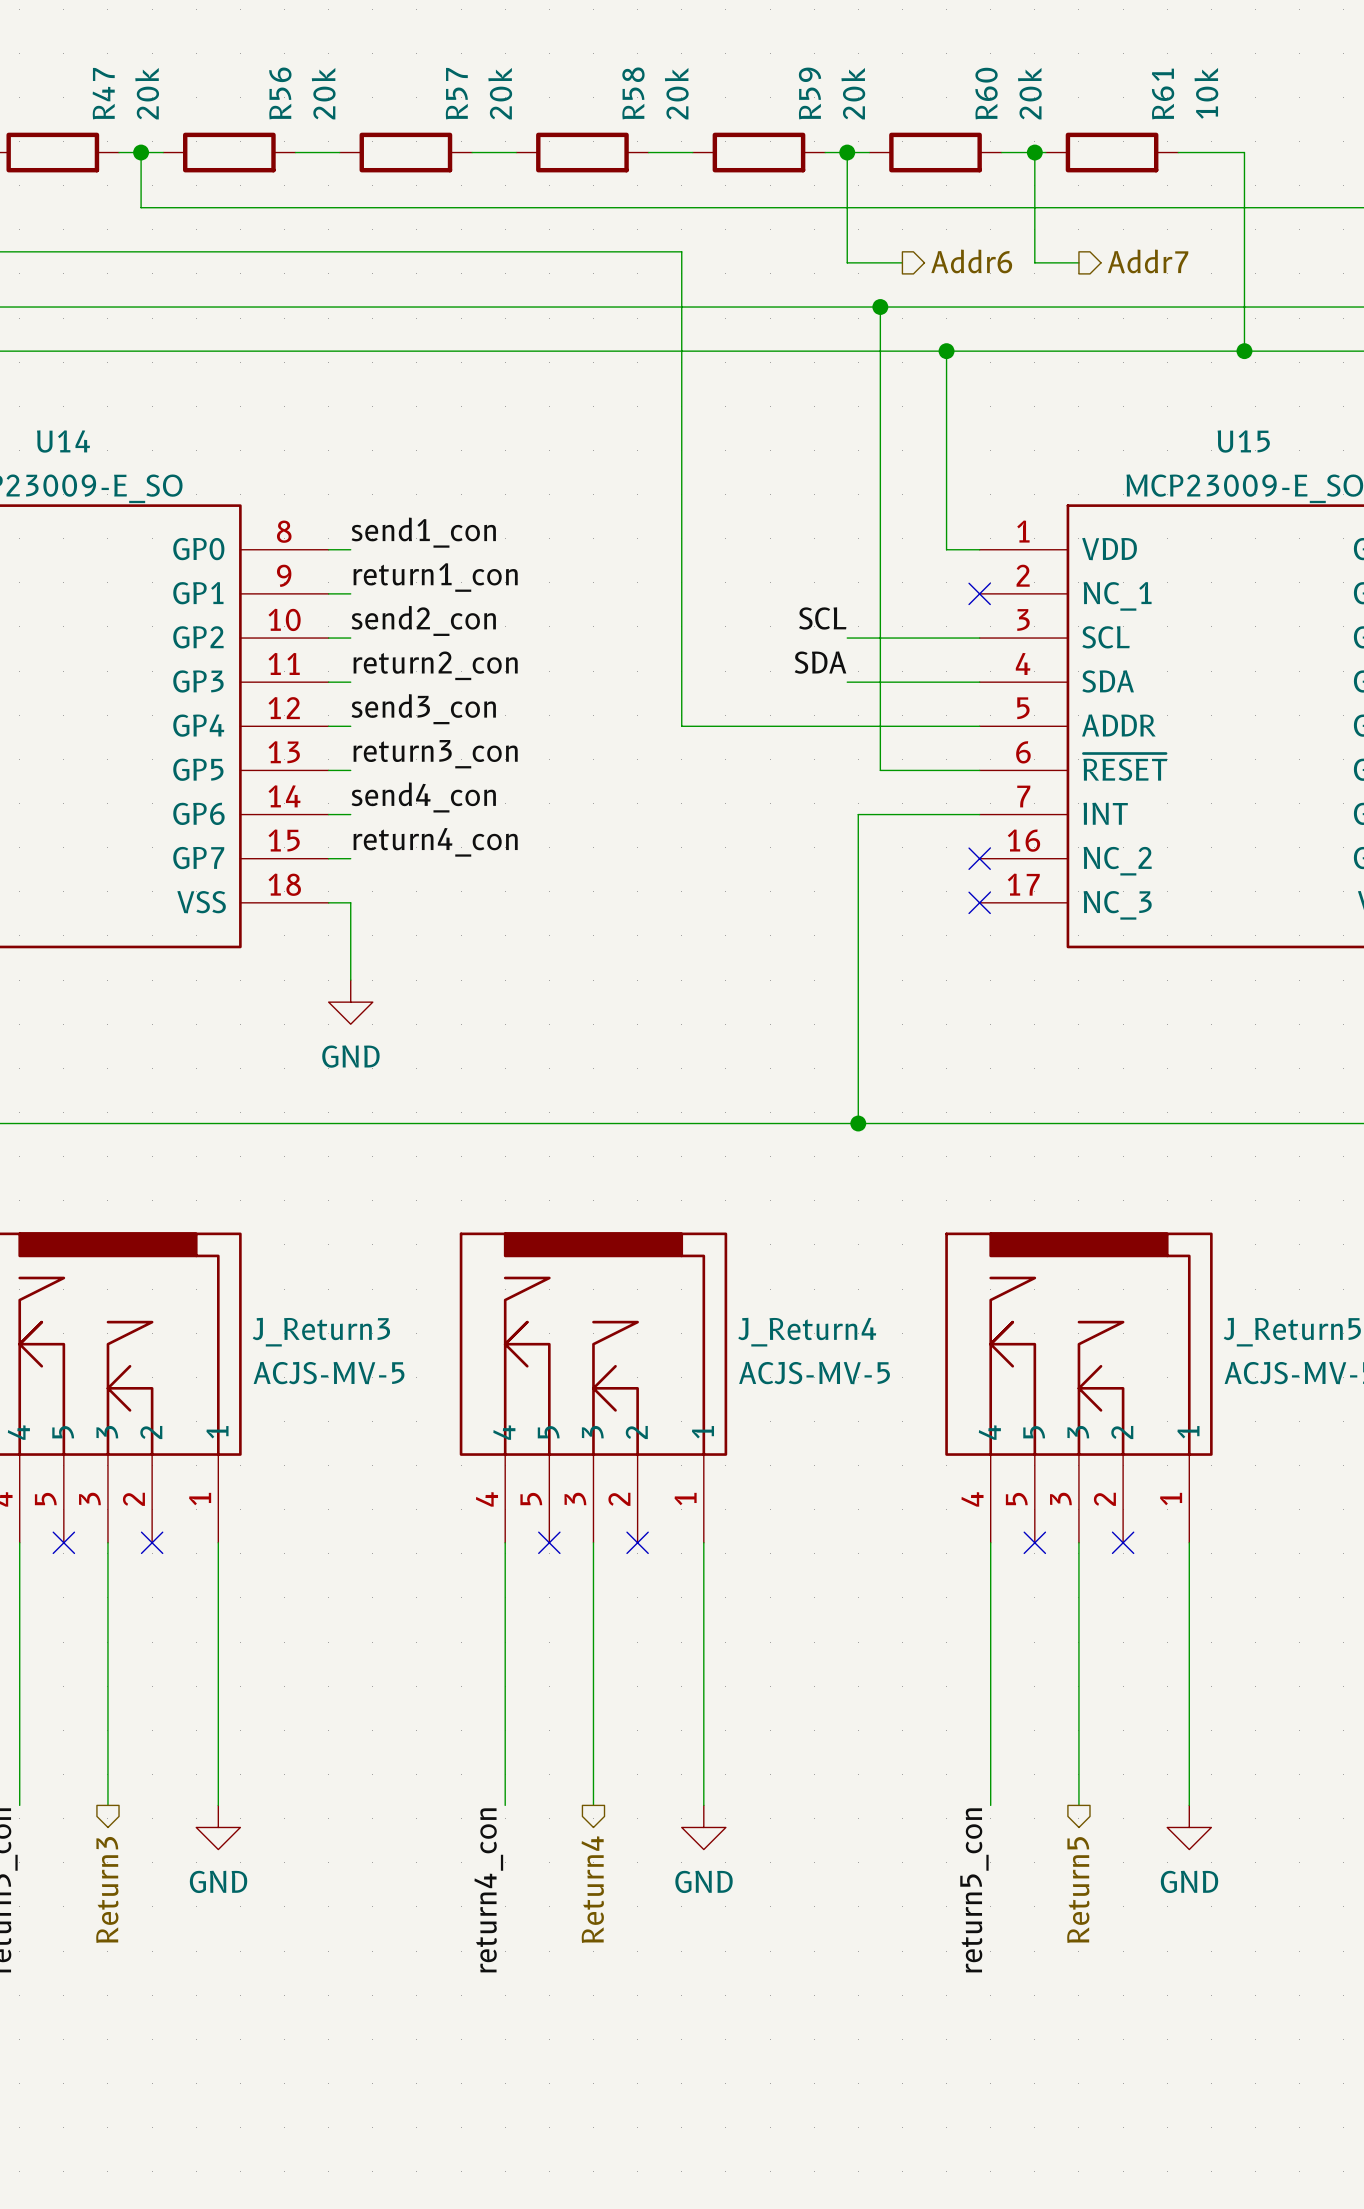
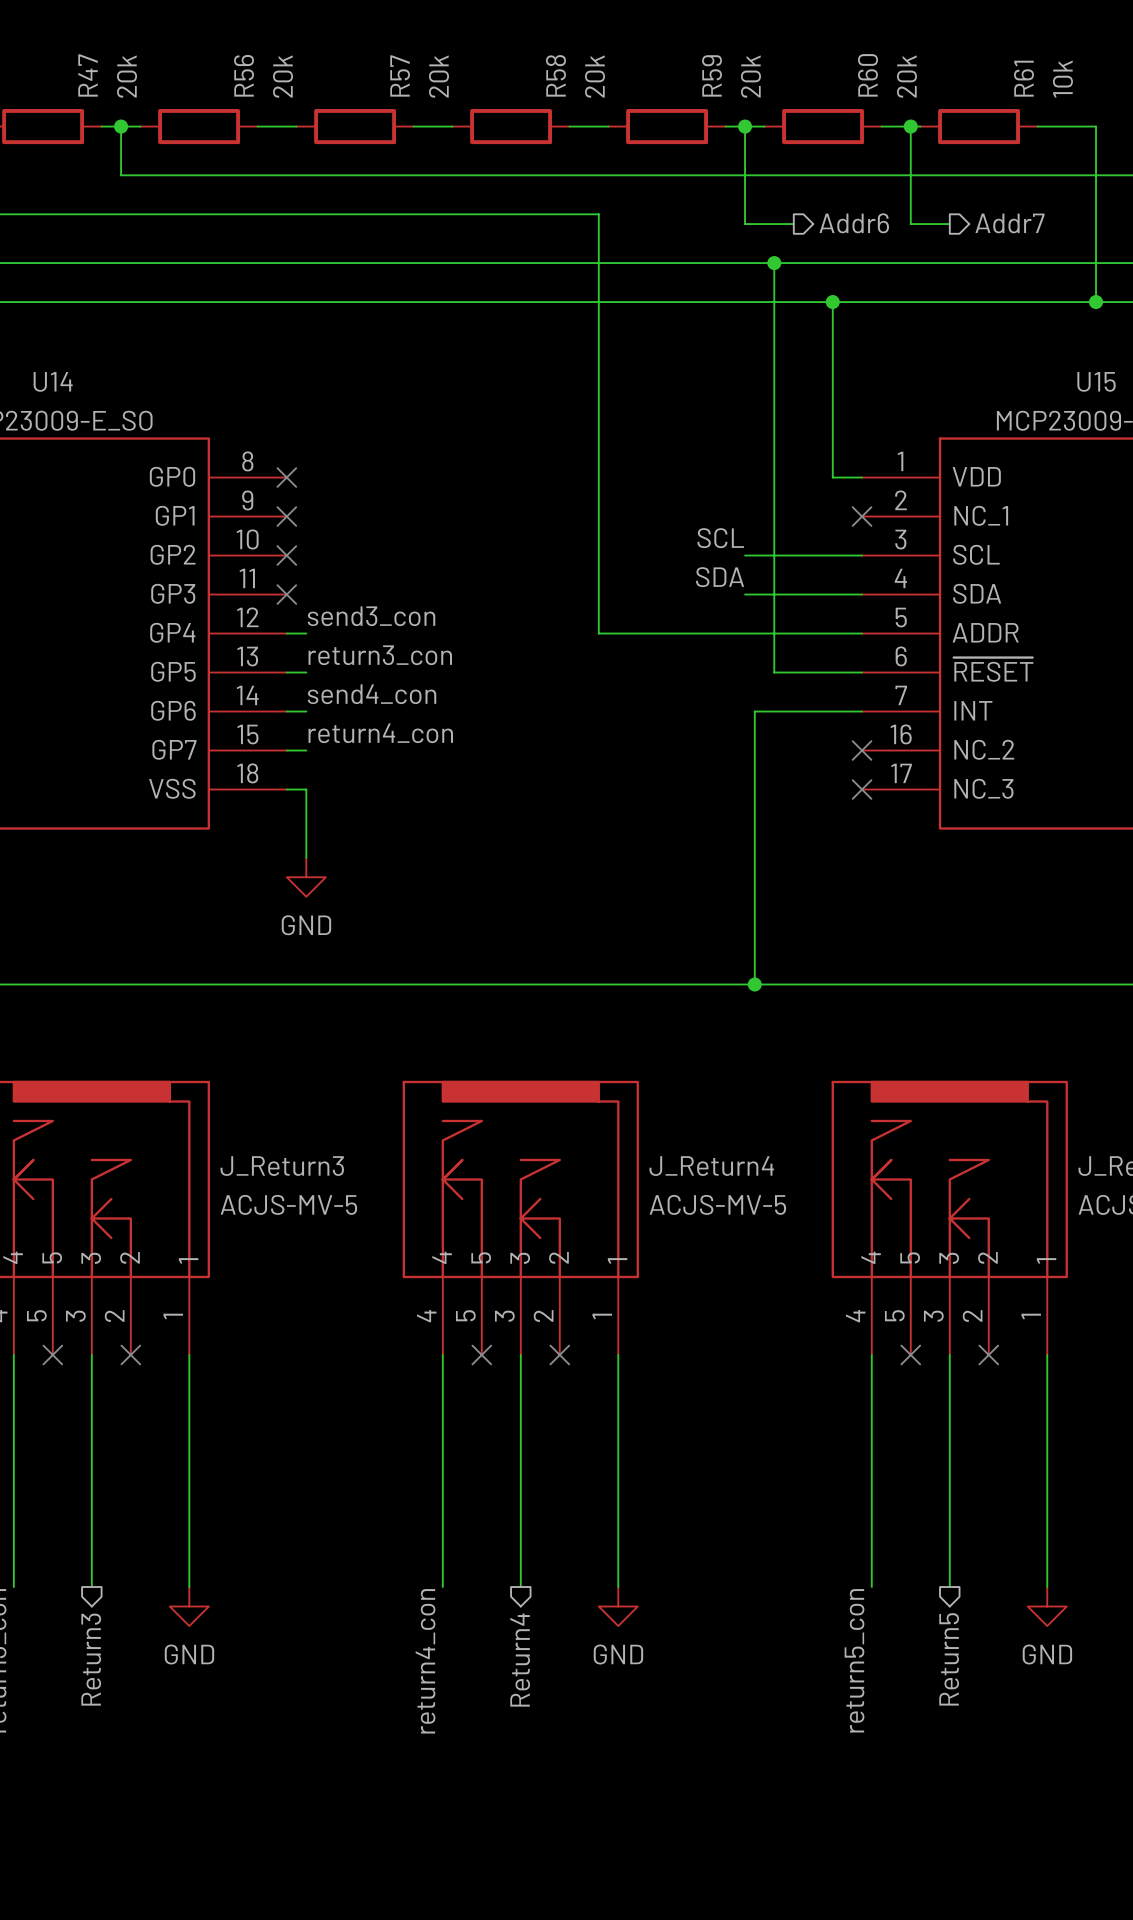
label: send1_con (423, 532) -> none
wire: (328, 549) (350, 549) -> none
no-connect mark: none -> (286, 477)
label: return1_con (435, 577) -> none
wire: (328, 593) (350, 593) -> none
no-connect mark: none -> (286, 516)
label: send2_con (423, 620) -> none
wire: (328, 638) (350, 638) -> none
no-connect mark: none -> (286, 555)
label: return2_con (435, 665) -> none
wire: (328, 682) (350, 682) -> none
no-connect mark: none -> (286, 594)

